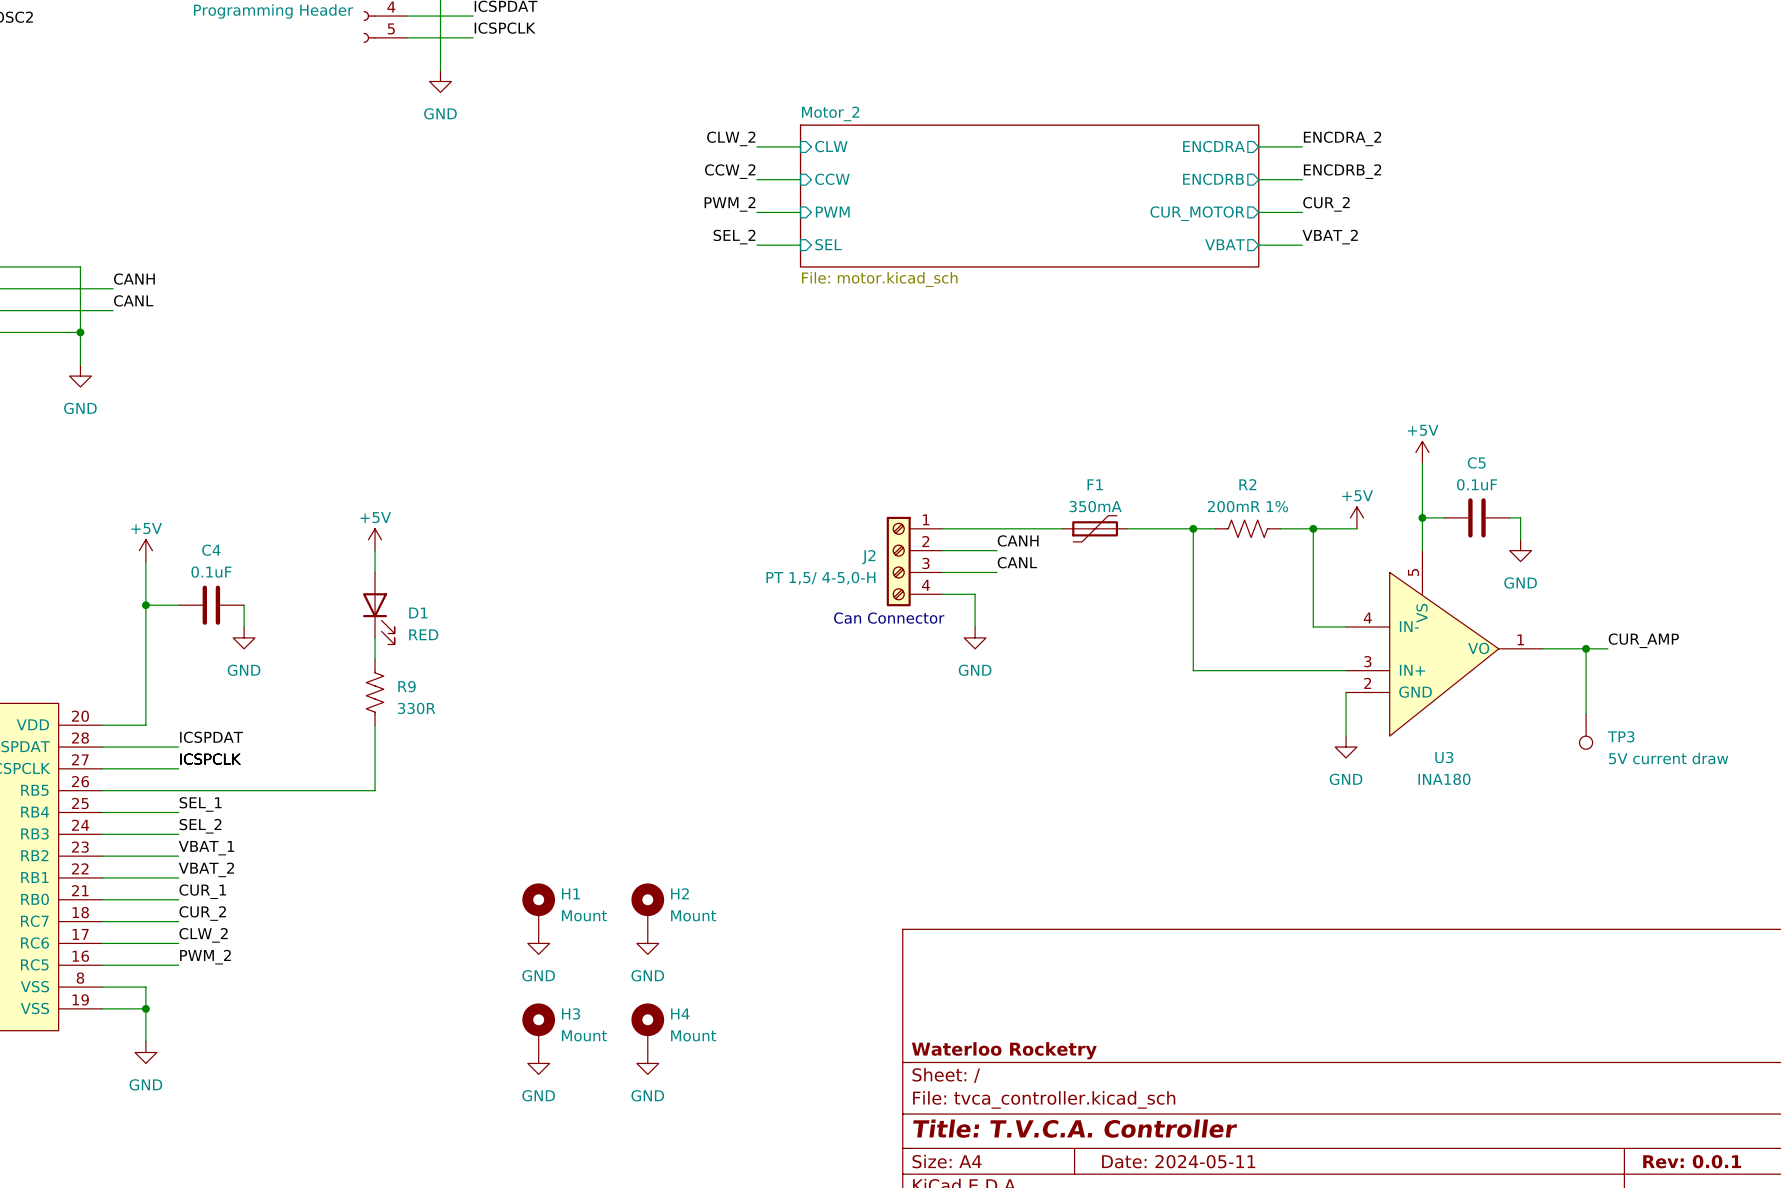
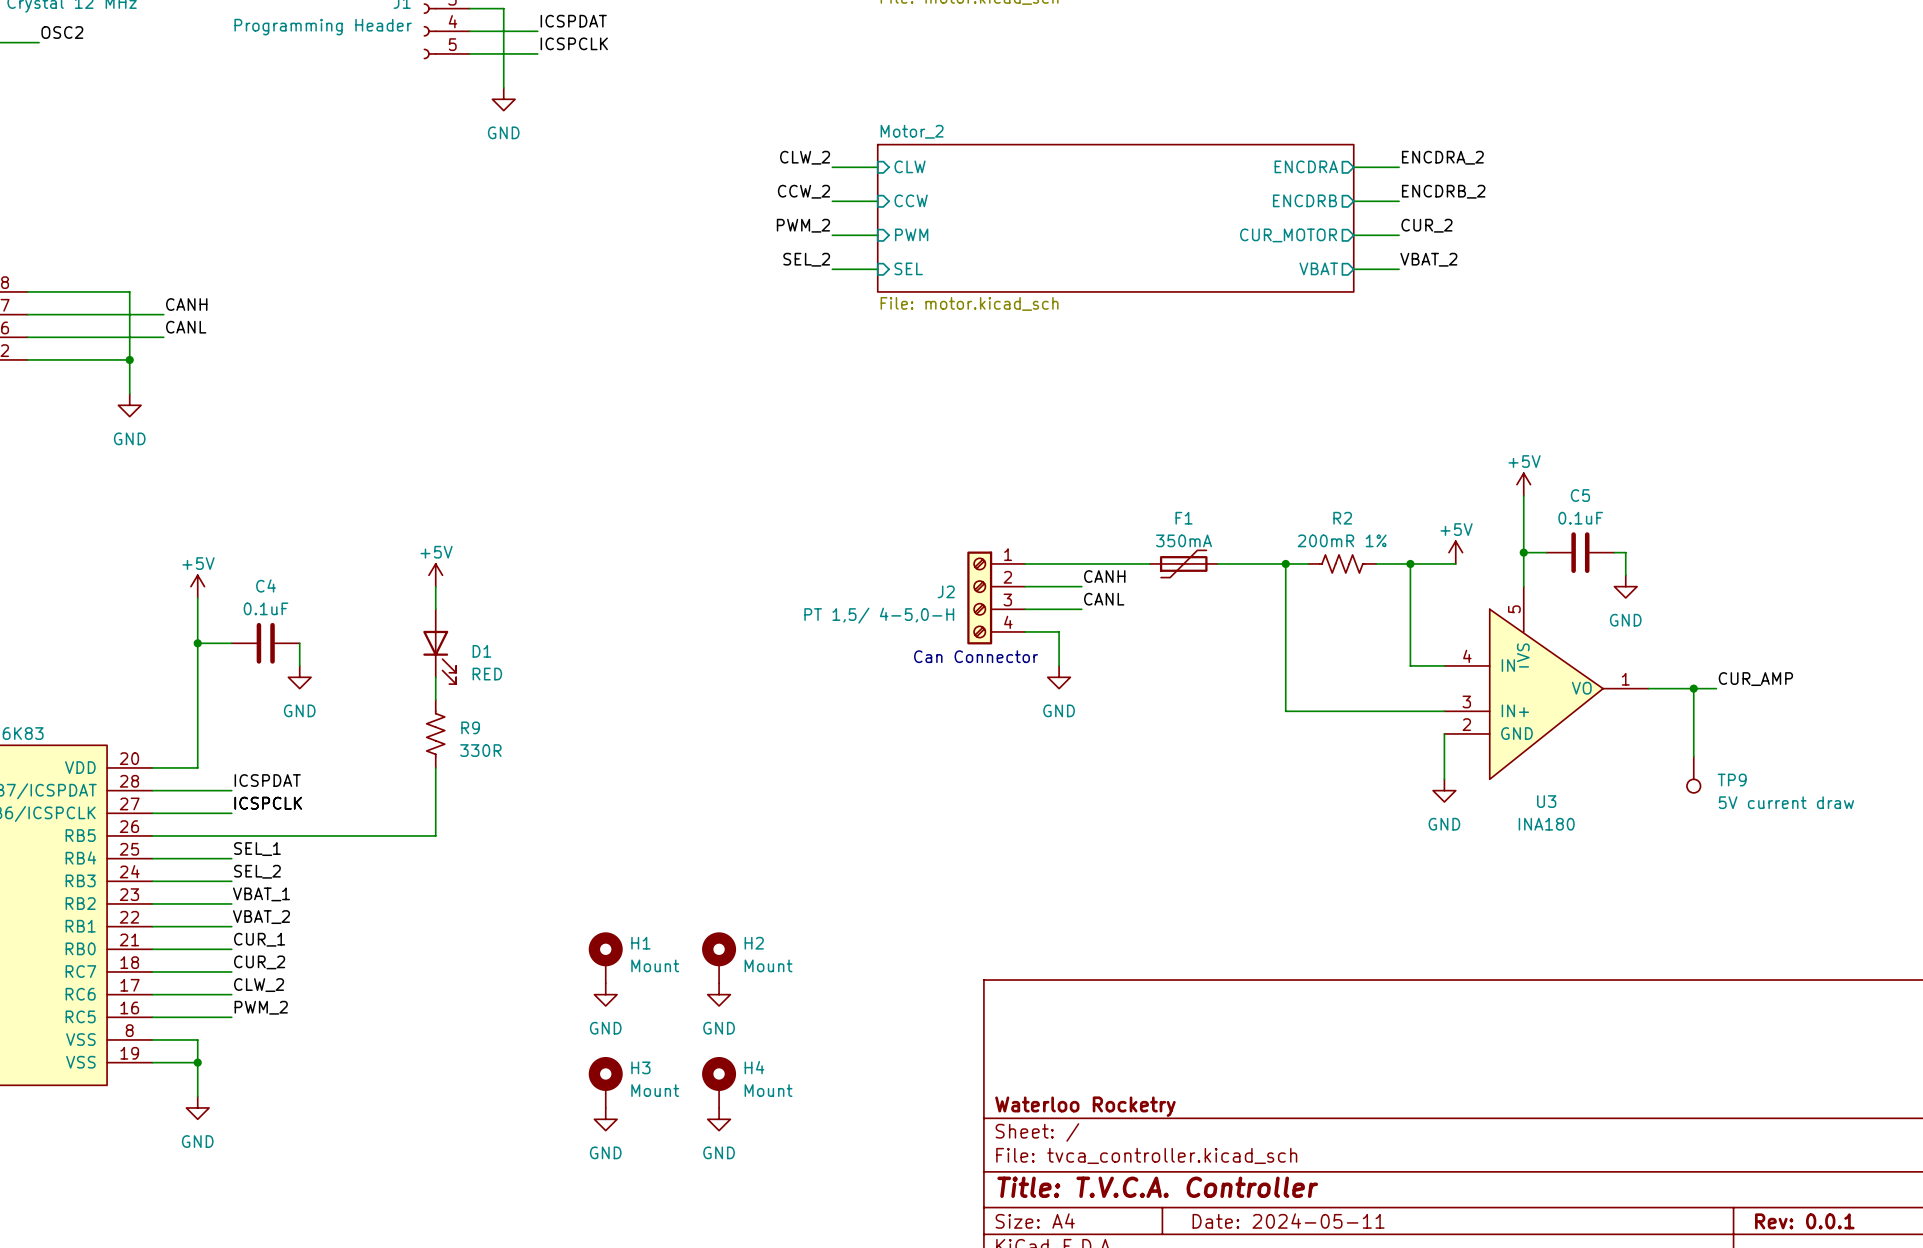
TP3 name: TP3 (1621, 736) -> TP9 (1732, 780)

